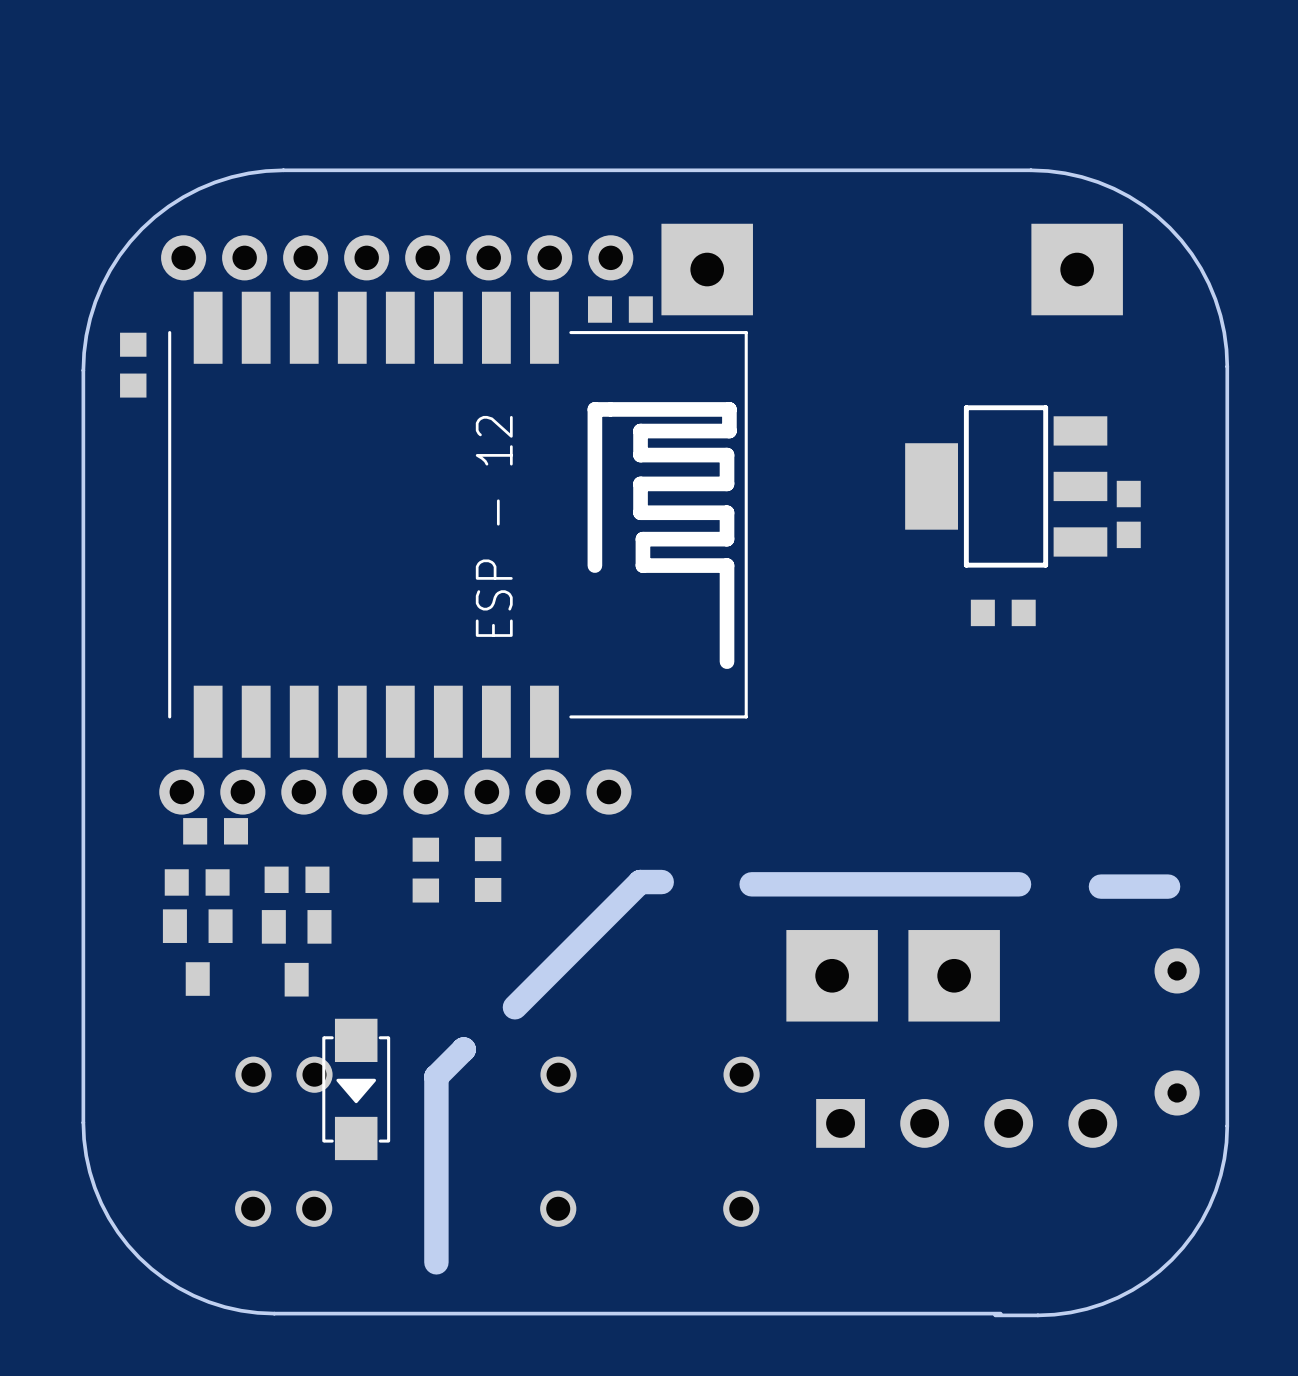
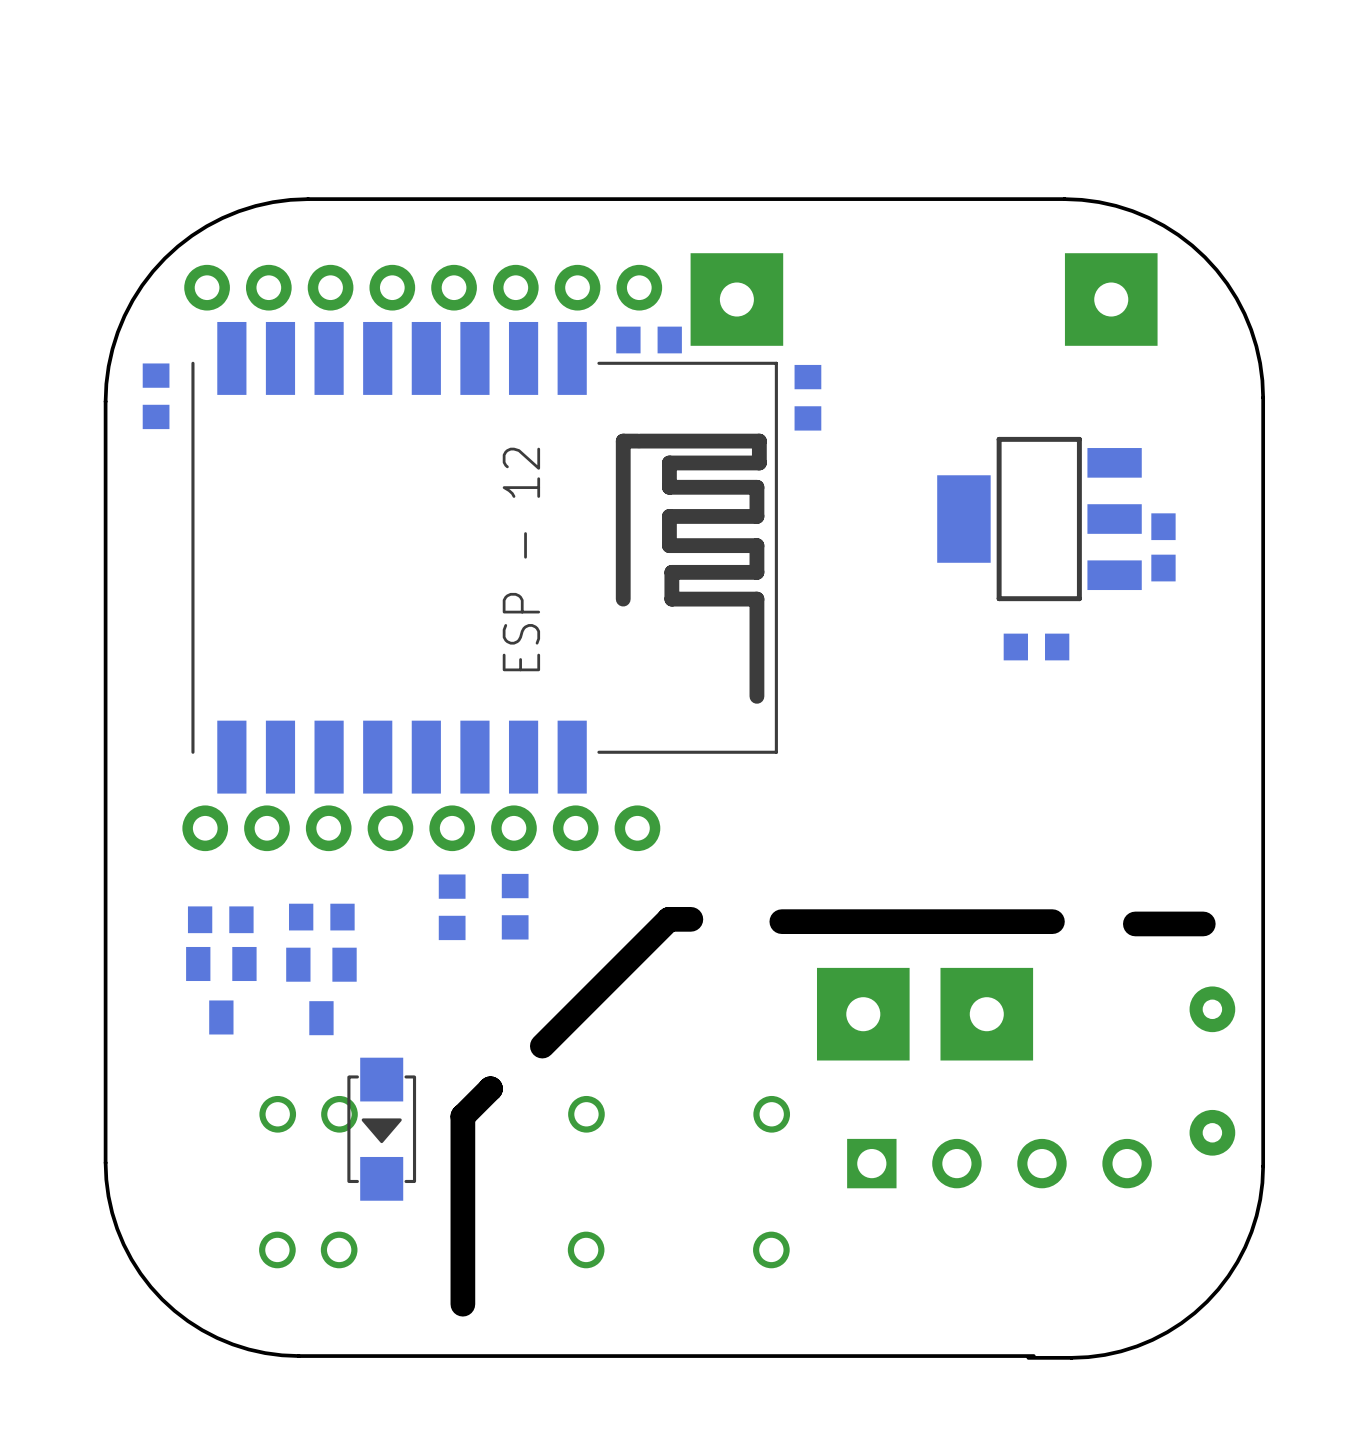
part: none -> (807, 397)
part: (215, 831) -> none

